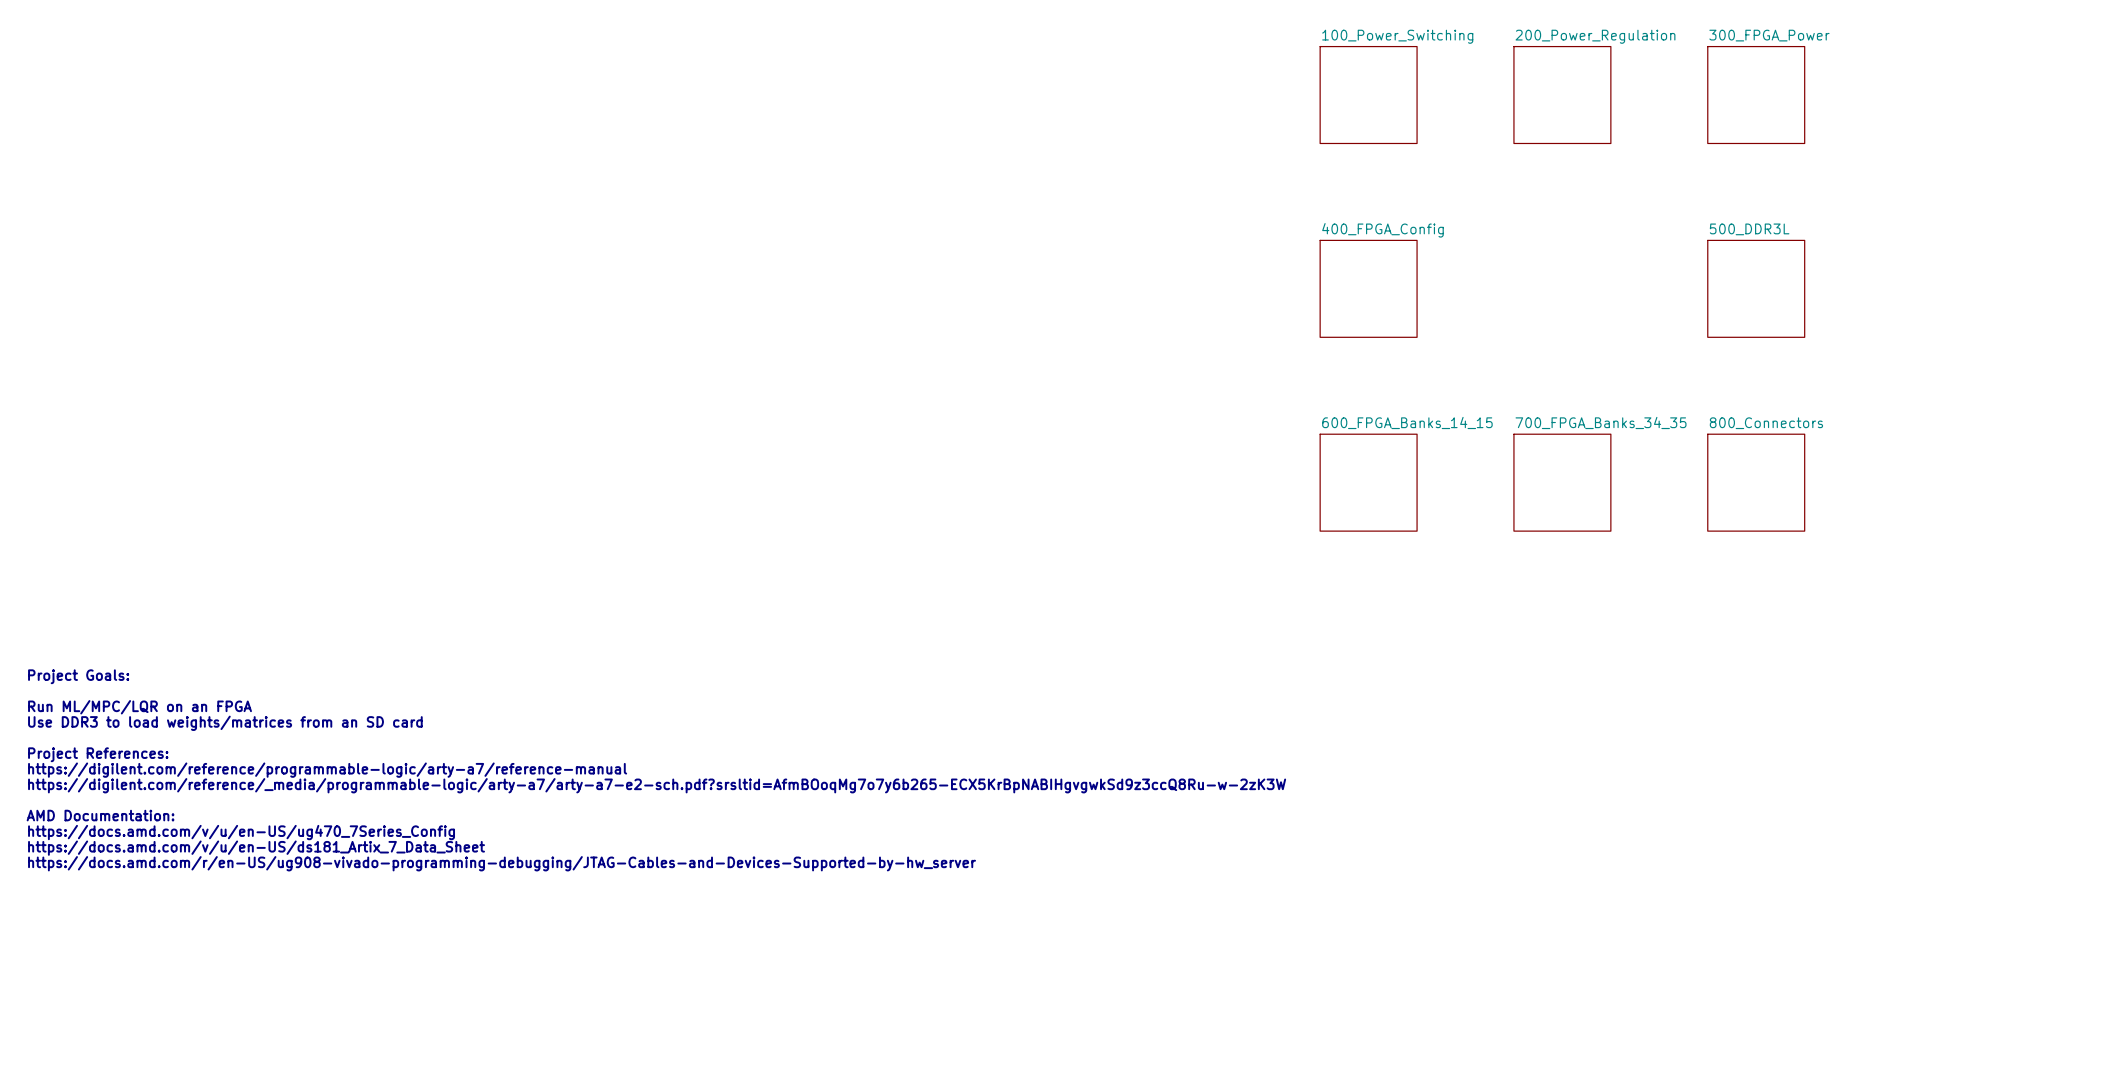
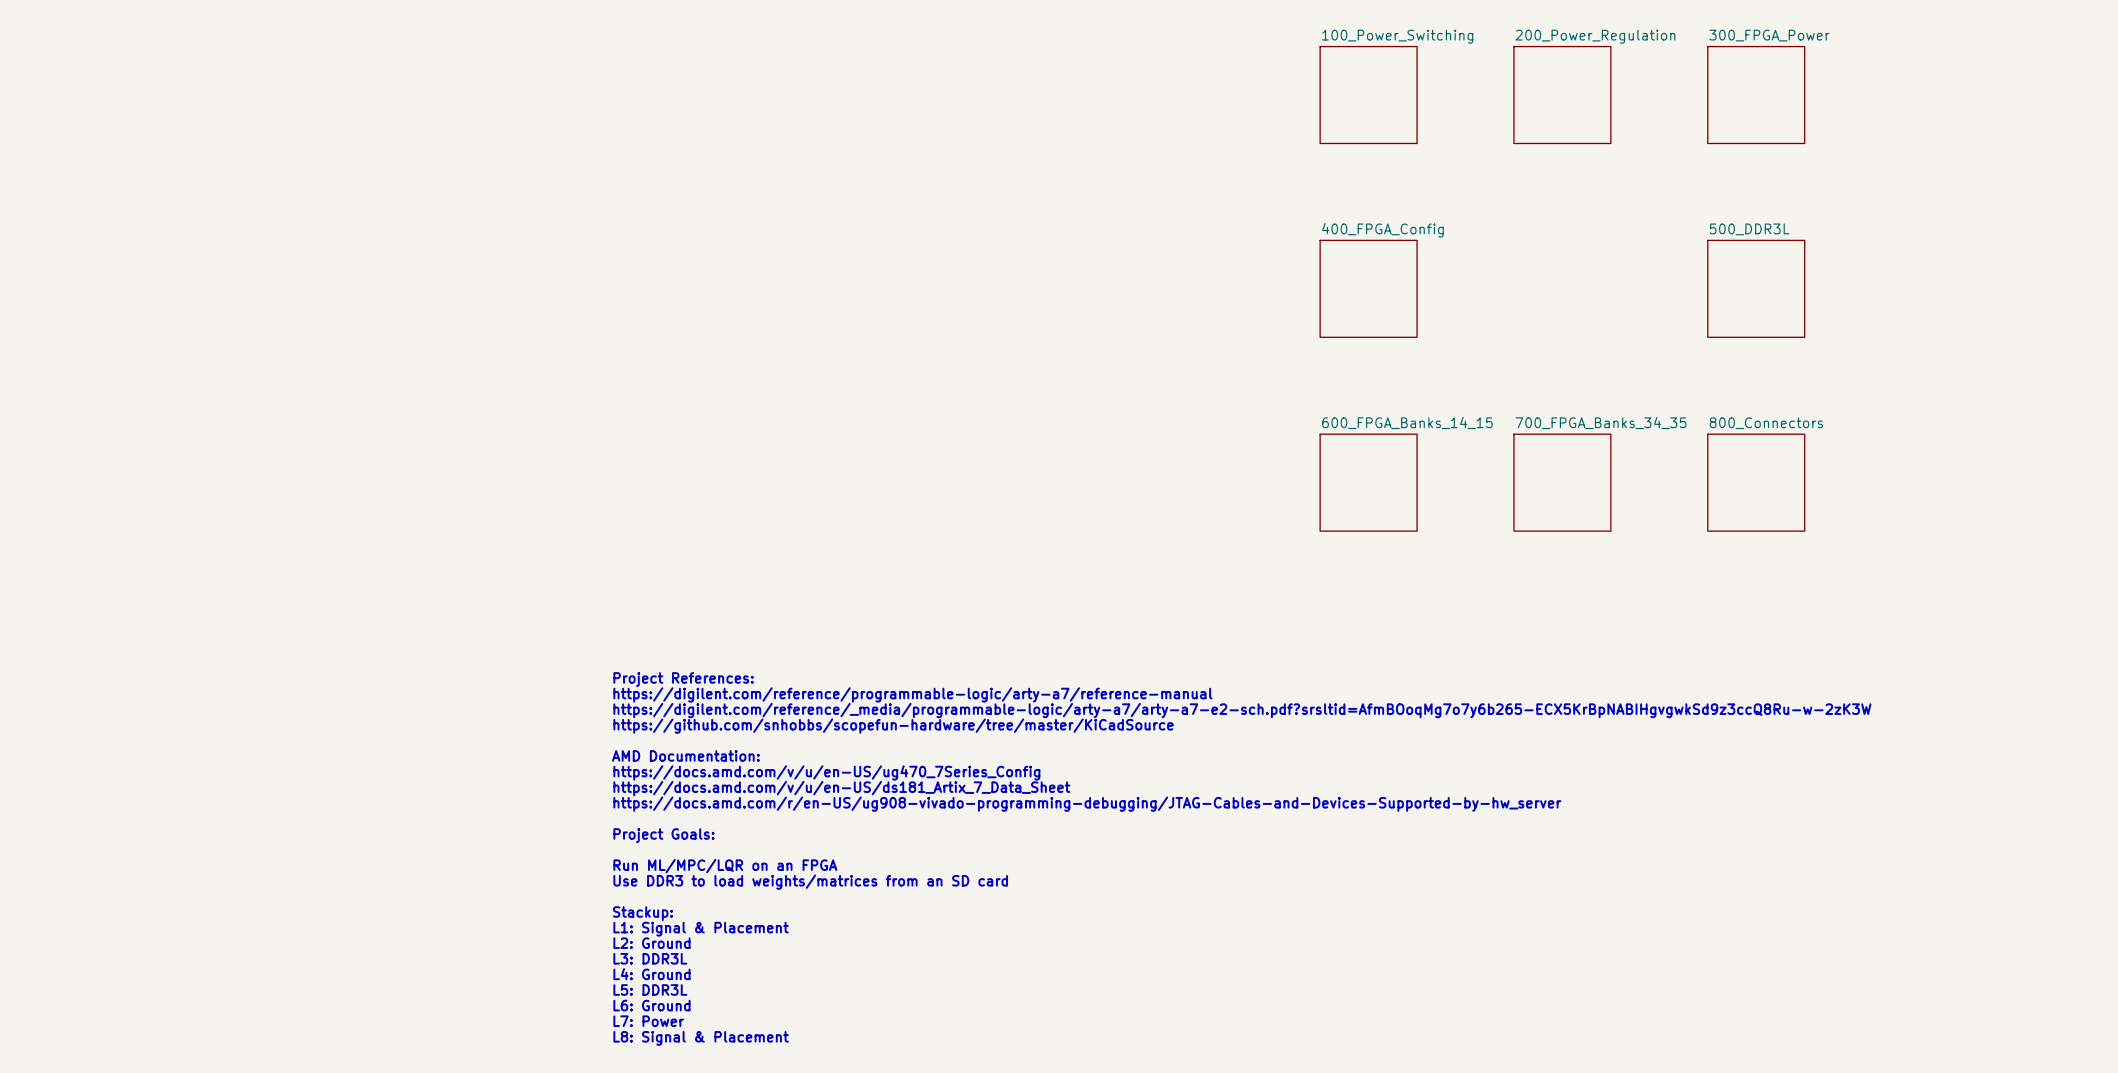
text: Project Goals: (78, 676) -> none
text: none -> Project References: (683, 679)
text: none -> https://digilent.com/reference/programmable-logic/arty-a7/reference-manual (912, 694)
text: Run ML/MPC/LQR on an FPGA (140, 707) -> none
text: none -> https://digilent.com/reference/_media/programmable-logic/arty-a7/arty-a7-e2-sch.pdf?srsltid=AfmBOoqMg7o7y6b265-ECX5KrBpNABIHgvgwkSd9z3ccQ8Ru-w-2zK3W (1242, 710)
text: Use DDR3 to load weights/matrices from an SD card (225, 723) -> none
text: none -> https://github.com/snhobbs/scopefun-hardware/tree/master/KiCadSource (893, 726)
text: Project References: (98, 754) -> none
text: none -> AMD Documentation: (685, 755)
text: https://digilent.com/reference/programmable-logic/arty-a7/reference-manual (327, 770) -> none
text: none -> https://docs.amd.com/v/u/en-US/ug470_7Series_Config (826, 772)
text: https://digilent.com/reference/_media/programmable-logic/arty-a7/arty-a7-e2-sch.pdf?srsltid=AfmBOoqMg7o7y6b265-ECX5KrBpNABIHgvgwkSd9z3ccQ8Ru-w-2zK3W (657, 785) -> none
text: none -> https://docs.amd.com/v/u/en-US/ds181_Artix_7_Data_Sheet (841, 788)
text: none -> https://docs.amd.com/r/en-US/ug908-vivado-programming-debugging/JTAG-Cables-and-Devices-Supported-by-hw_server (1087, 804)
text: AMD Documentation: (100, 815) -> none
text: https://docs.amd.com/v/u/en-US/ug470_7Series_Config (241, 832) -> none
text: none -> Project Goals: (663, 835)
text: https://docs.amd.com/v/u/en-US/ds181_Artix_7_Data_Sheet (256, 848) -> none
text: https://docs.amd.com/r/en-US/ug908-vivado-programming-debugging/JTAG-Cables-and-Devices-Supported-by-hw_server (502, 863) -> none
text: none -> Run ML/MPC/LQR on an FPGA (725, 866)
text: none -> Use DDR3 to load weights/matrices from an SD card (810, 882)
text: none -> Stackup: (642, 913)
text: none -> L1: Signal & Placement (701, 929)
text: none -> L2: Ground (651, 943)
text: none -> L3: DDR3L (650, 958)
text: none -> L4: Ground (651, 974)
text: none -> L5: DDR3L (650, 989)
text: none -> L6: Ground (651, 1005)
text: none -> L7: Power (648, 1021)
text: none -> L8: Signal & Placement (701, 1038)

